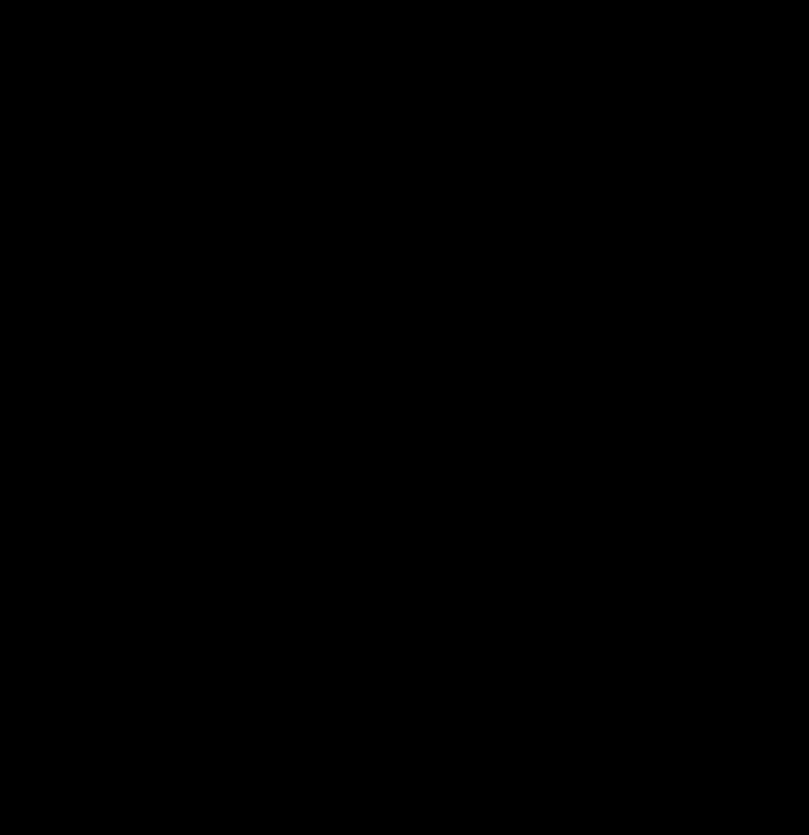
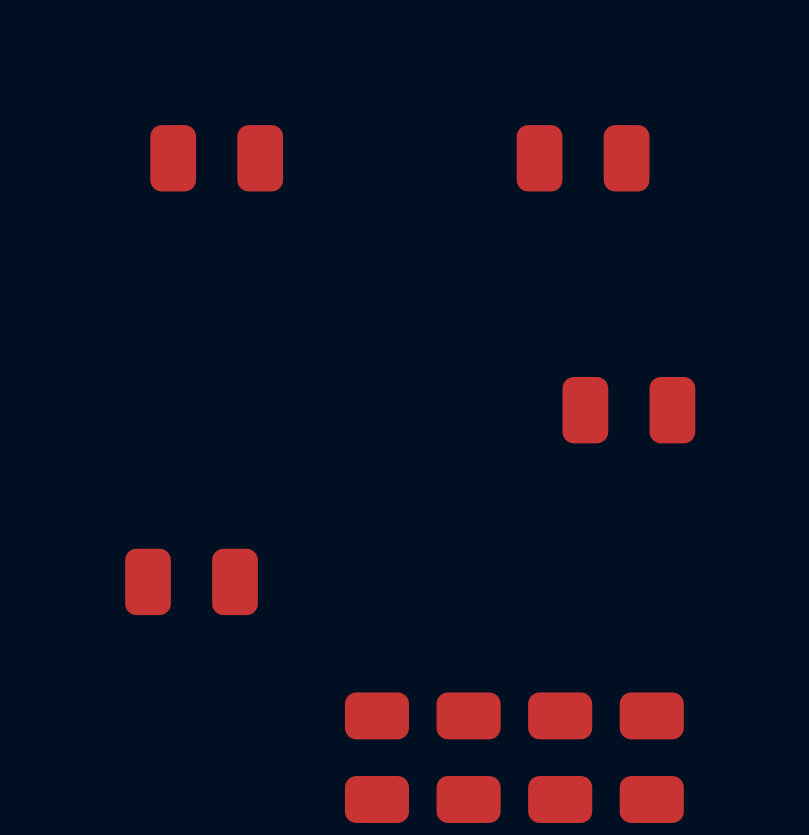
part: none -> (216, 158)
part: none -> (583, 158)
part: none -> (628, 410)
part: none -> (191, 581)
part: none -> (376, 757)
part: none -> (468, 757)
part: none -> (560, 757)
part: none -> (651, 757)

